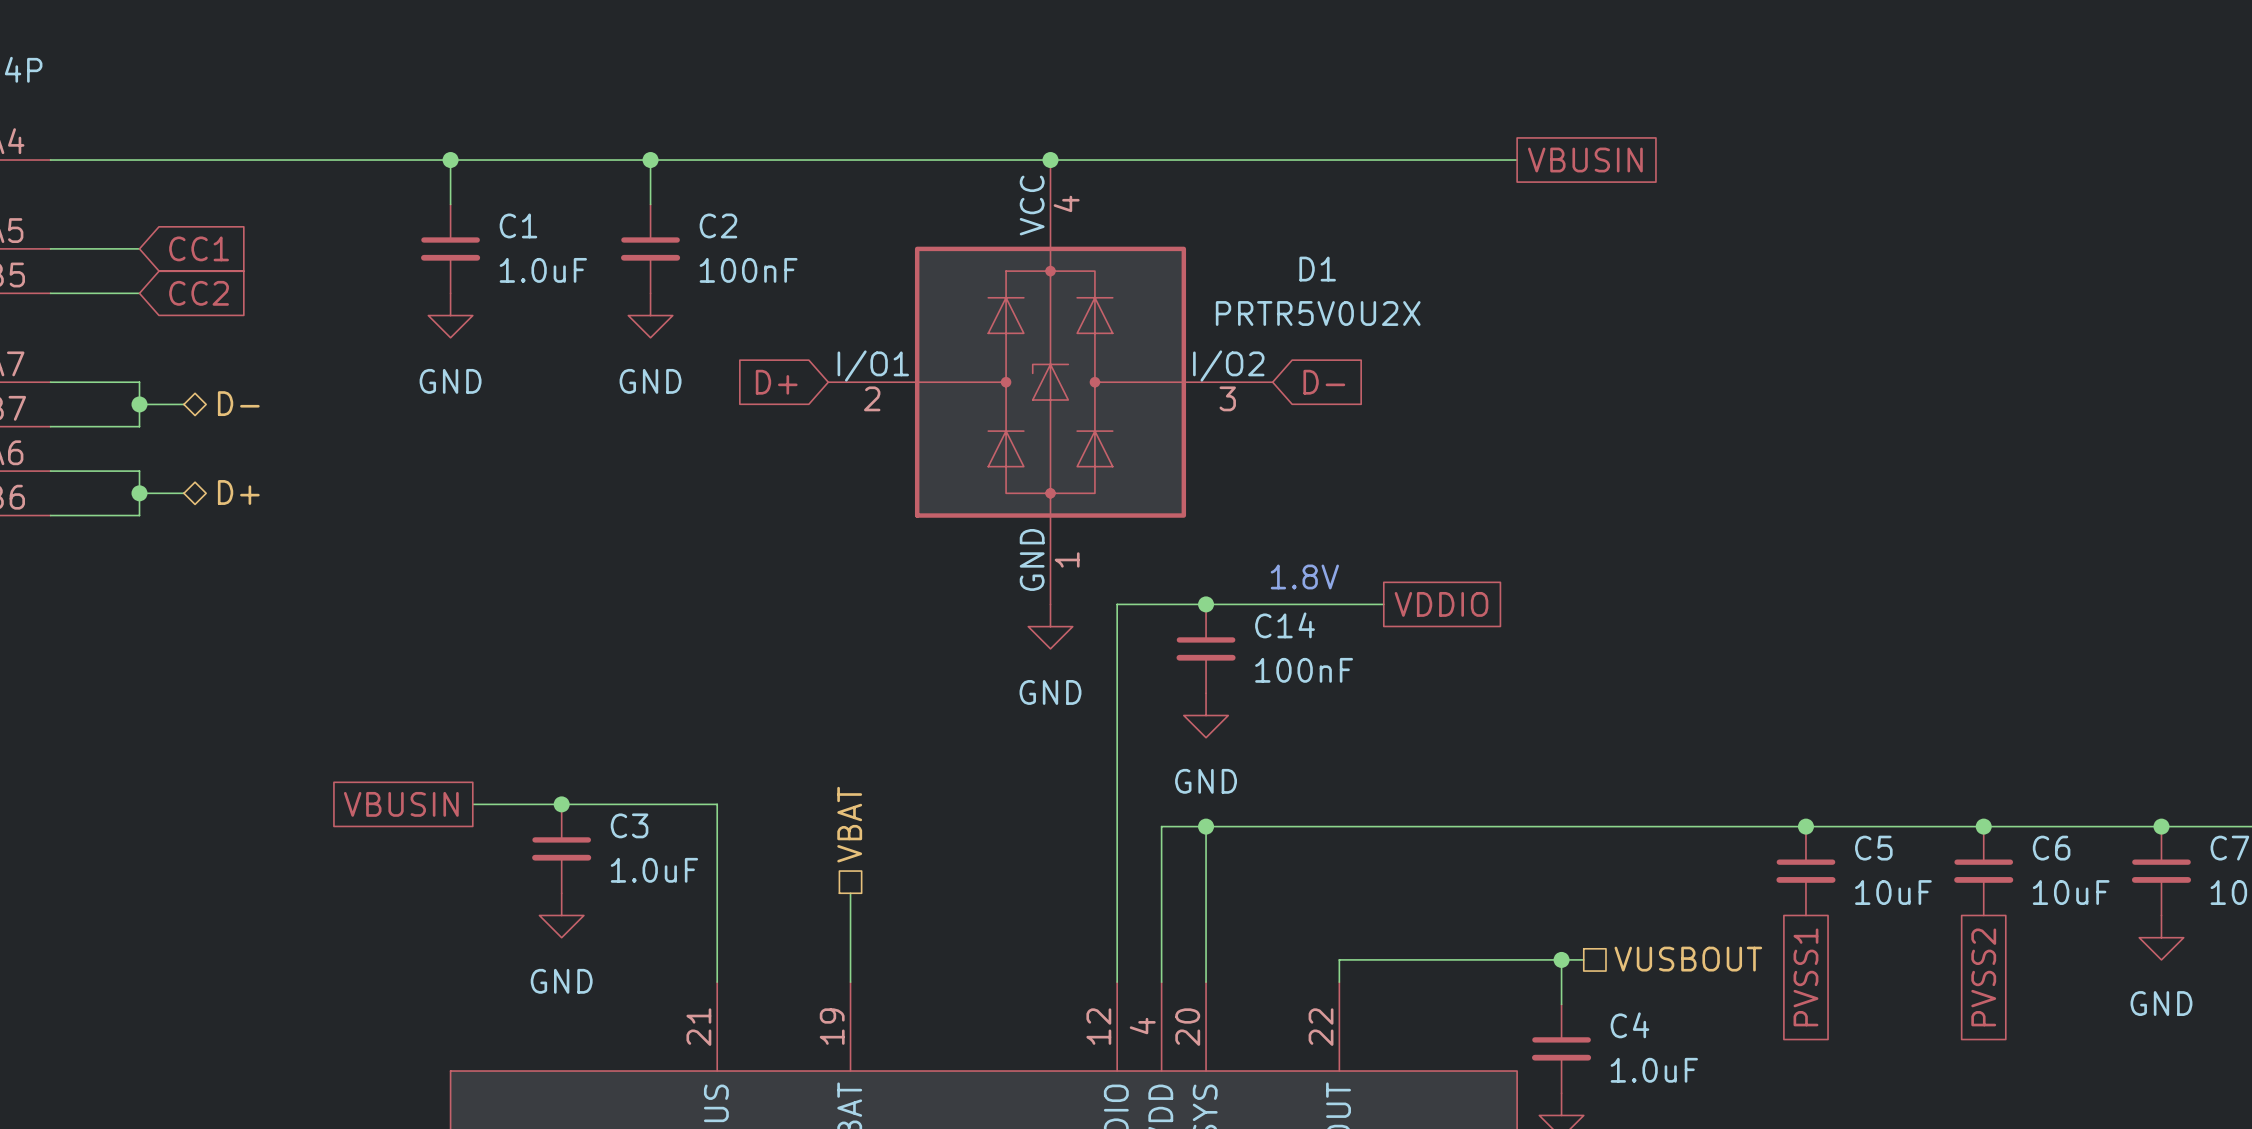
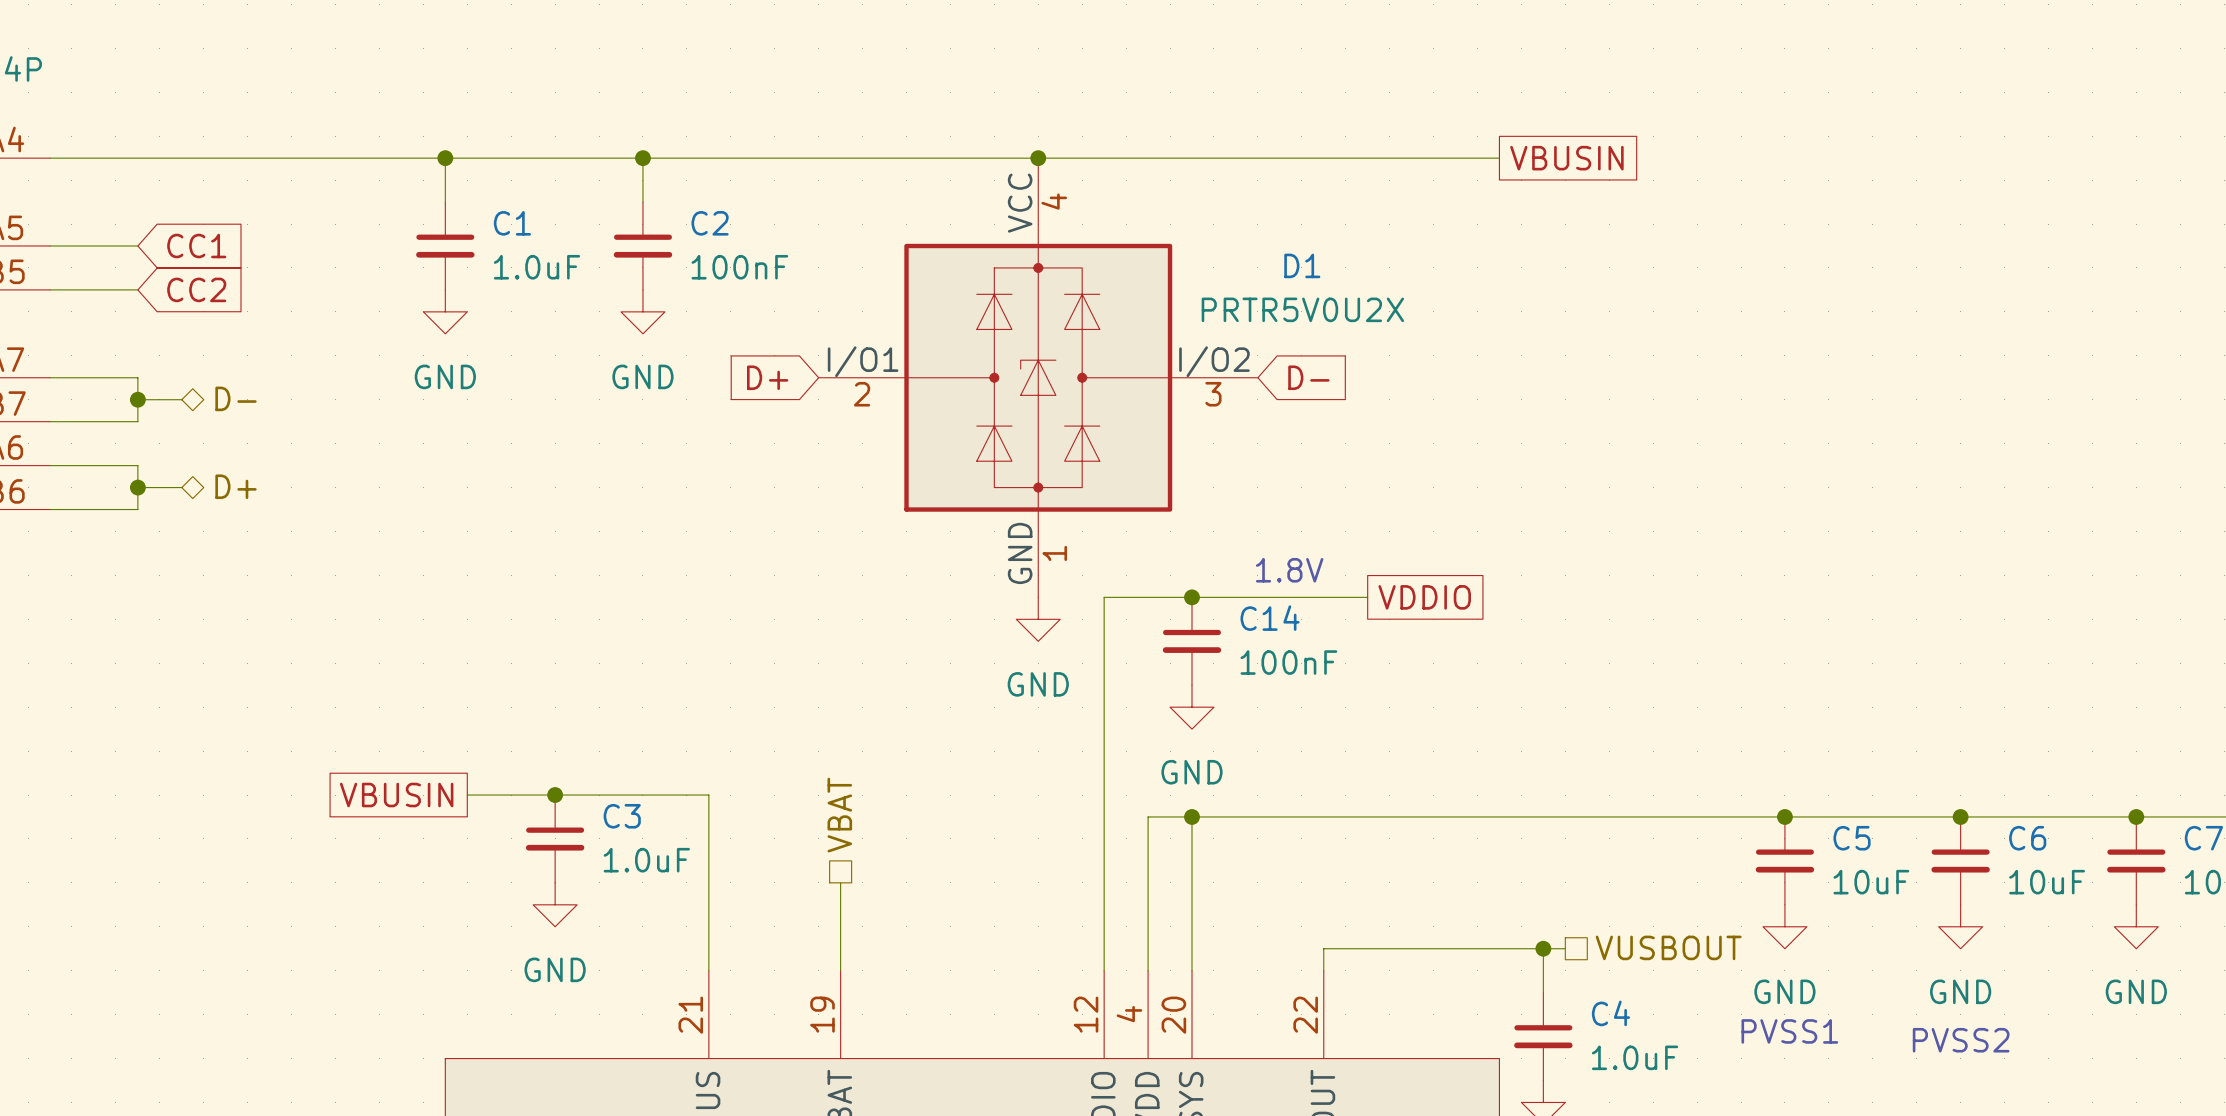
power symbol: none -> GND (1784, 926)
power symbol: none -> GND (1960, 926)
global label: PVSS1 (1805, 977) -> none
global label: PVSS2 (1983, 977) -> none
text: none -> PVSS1 (1789, 1031)
text: none -> PVSS2 (1961, 1040)

